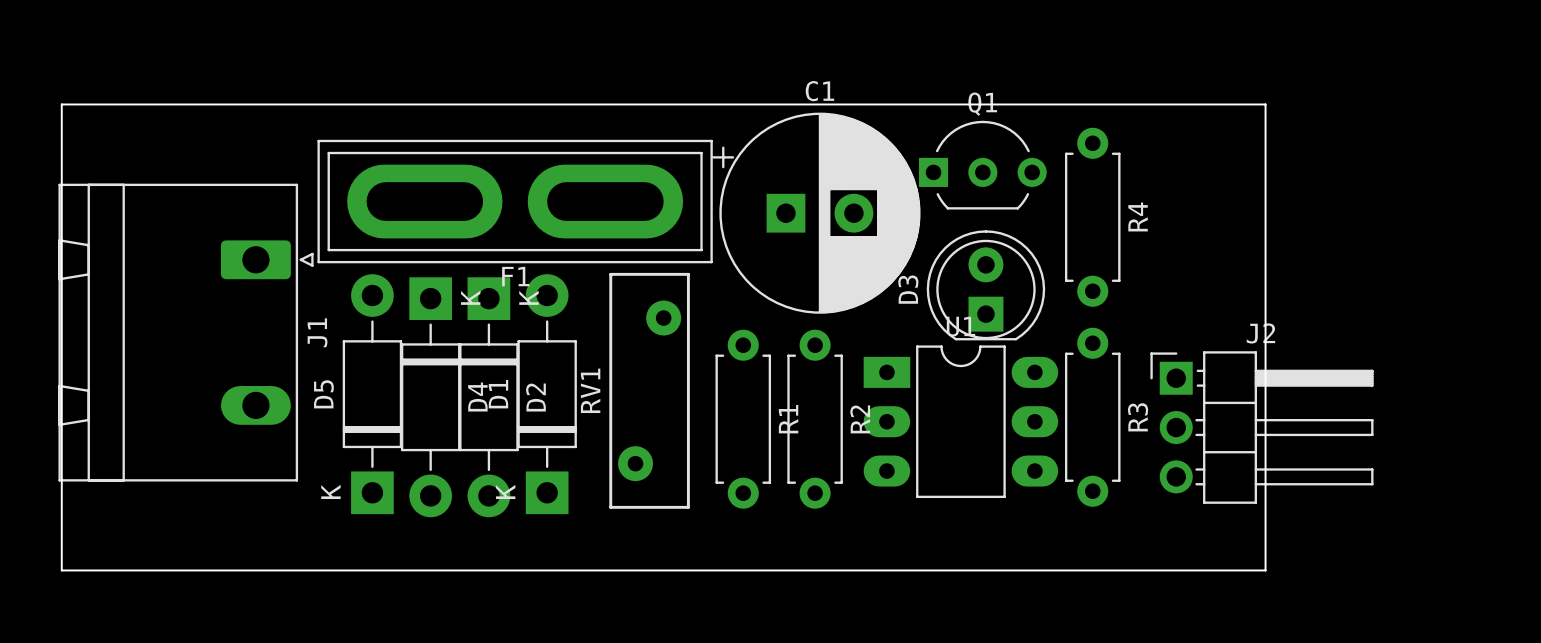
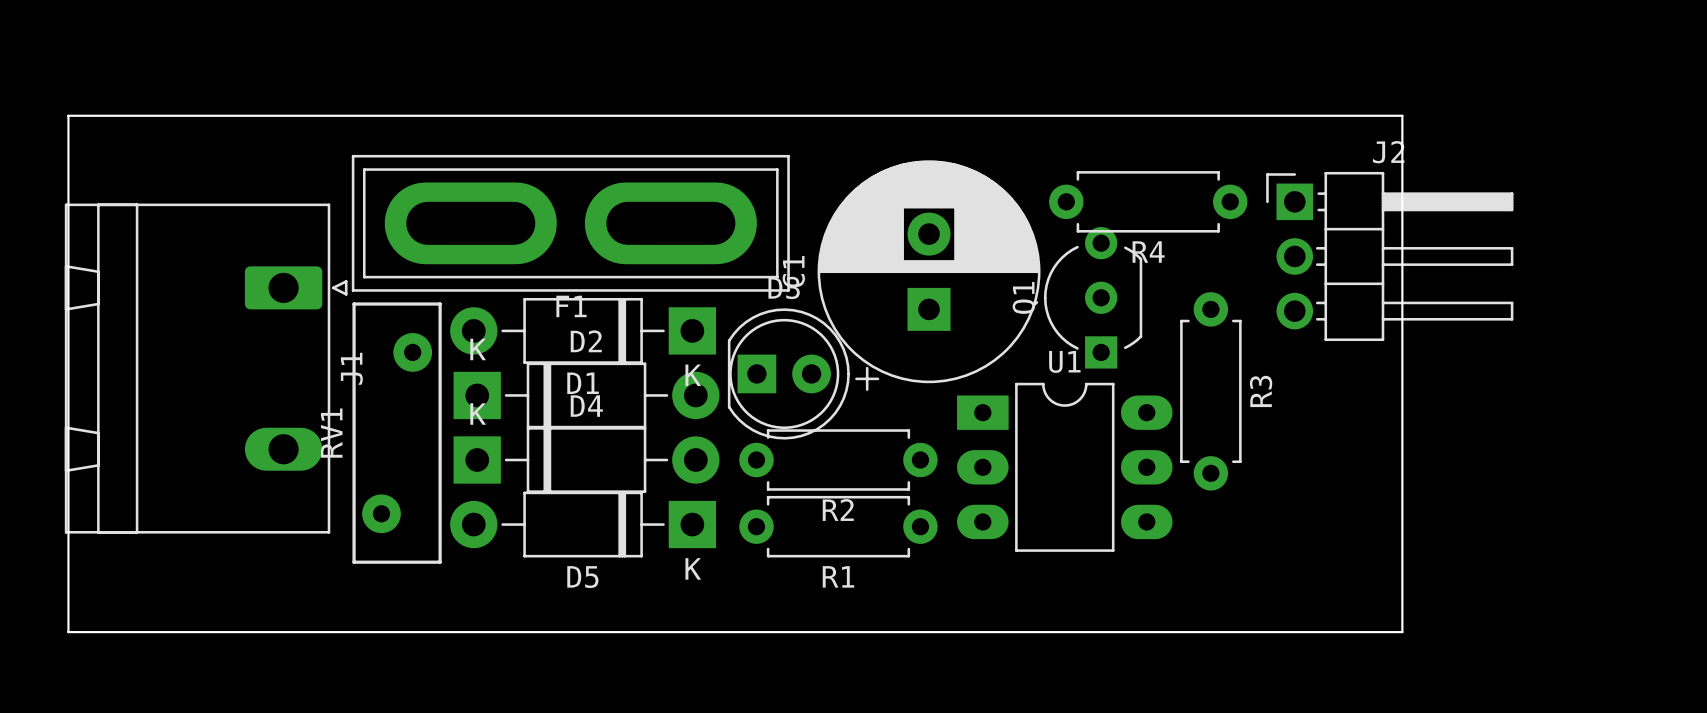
Q1 rotation: 0° (982, 165) -> 90° counterclockwise (1093, 297)
Q1 position: (982, 165) -> (1093, 297)
C1 rotation: 0° (816, 213) -> 90° counterclockwise (929, 275)
R4 rotation: 0° (1092, 217) -> 90° clockwise (1148, 201)
D3 rotation: 0° (985, 285) -> 90° clockwise (788, 373)
D3 position: (985, 285) -> (788, 373)
RV1 position: (649, 390) -> (397, 433)
D5 rotation: 0° (372, 394) -> 90° counterclockwise (583, 524)
D5 position: (372, 394) -> (583, 524)
D1 rotation: 0° (547, 394) -> 90° counterclockwise (583, 330)
D4 rotation: 0° (430, 397) -> 90° counterclockwise (586, 460)
D2 rotation: 0° (488, 397) -> 90° counterclockwise (586, 395)
R3 position: (1092, 417) -> (1210, 391)
R1 rotation: 0° (743, 419) -> 90° clockwise (838, 526)
R2 rotation: 0° (815, 419) -> 90° clockwise (838, 460)
J2 position: (1261, 427) -> (1389, 256)

